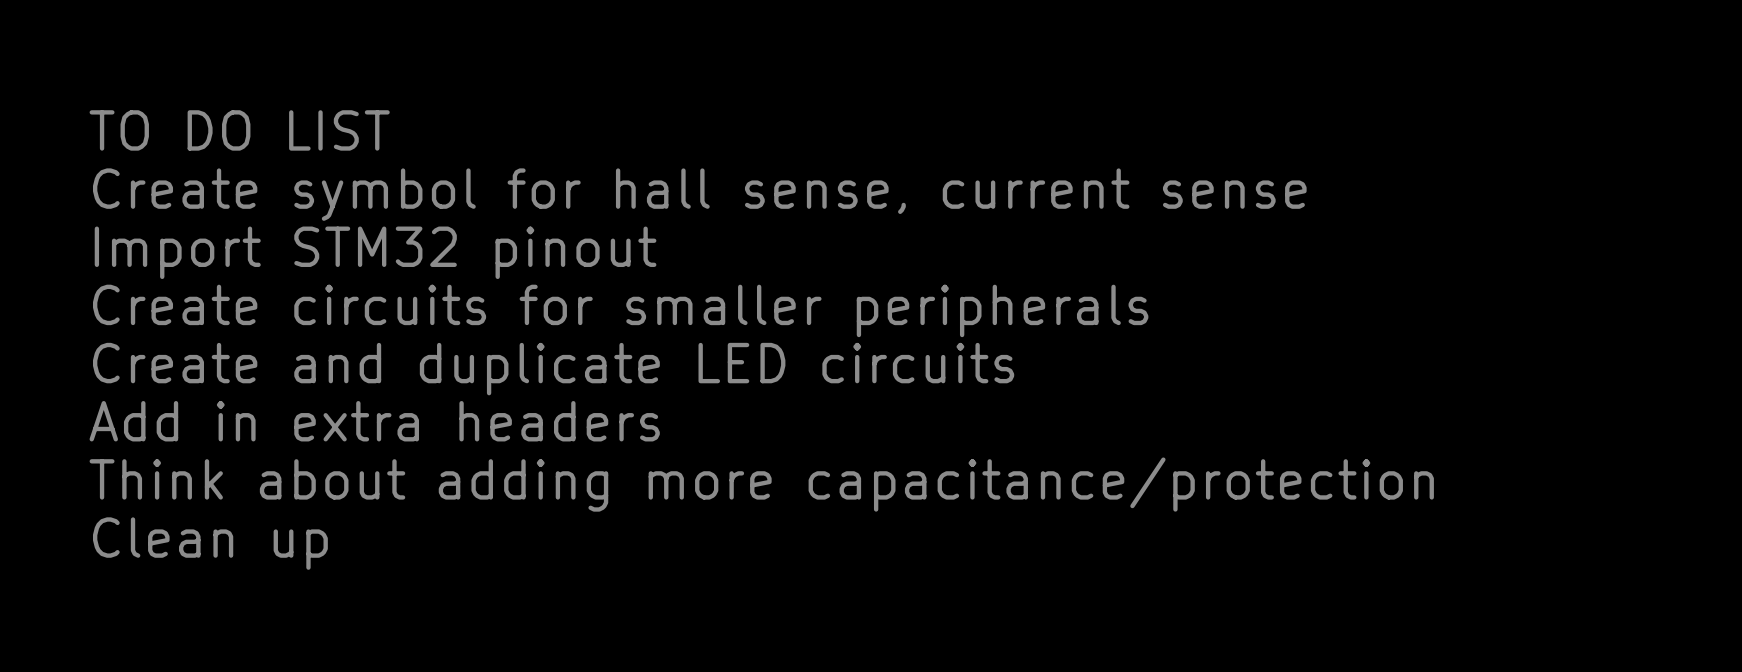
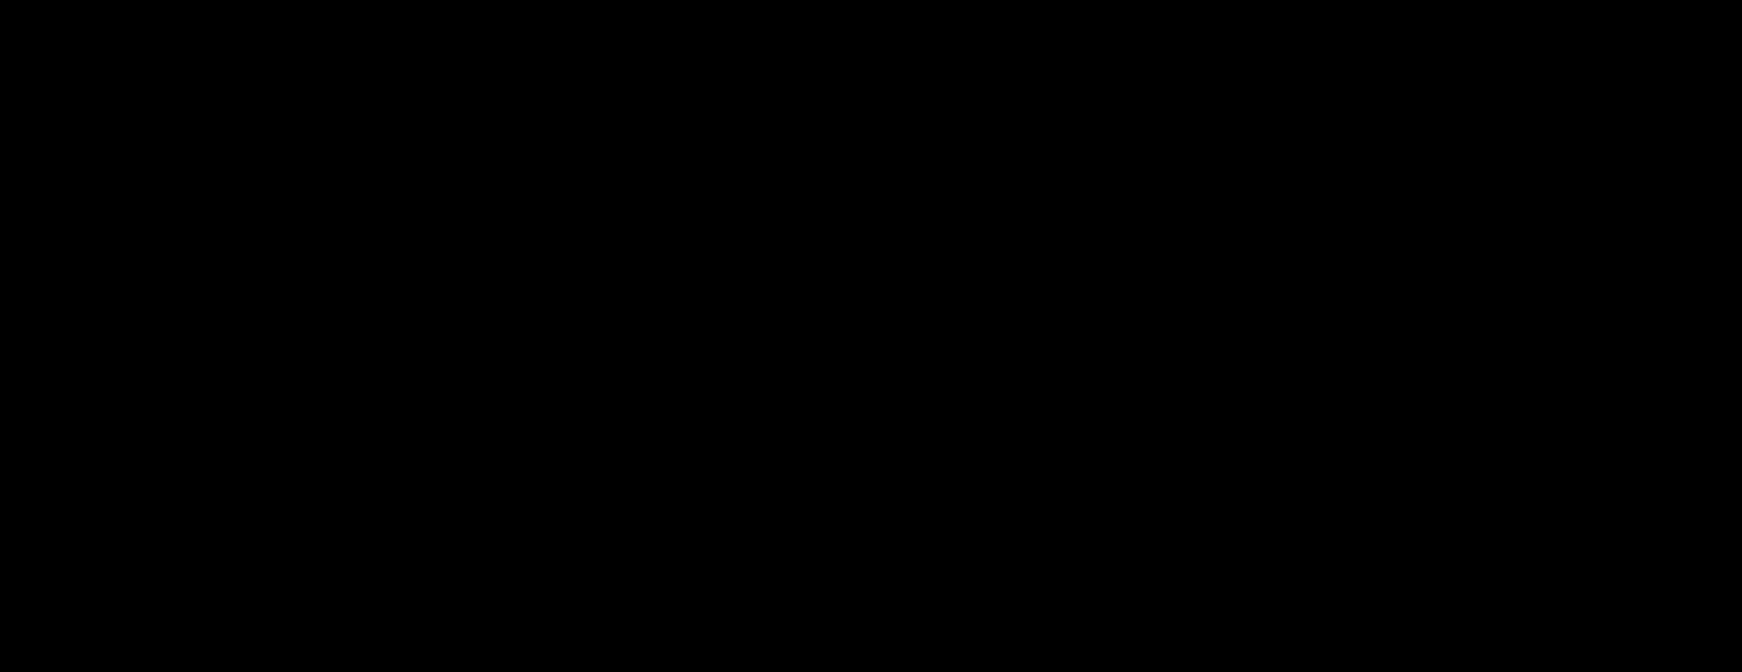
text: TO DO LIST (239, 130) -> none
text: Create symbol for hall sense, current sense (699, 194) -> none
text: Import STM32 pinout (375, 252) -> none
text: Create circuits for smaller peripherals (620, 310) -> none
text: Create and duplicate LED circuits (553, 369) -> none
text: Add in extra headers (374, 421) -> none
text: Think about adding more capacitance/protection (761, 484) -> none
text: Clean up (210, 543) -> none

